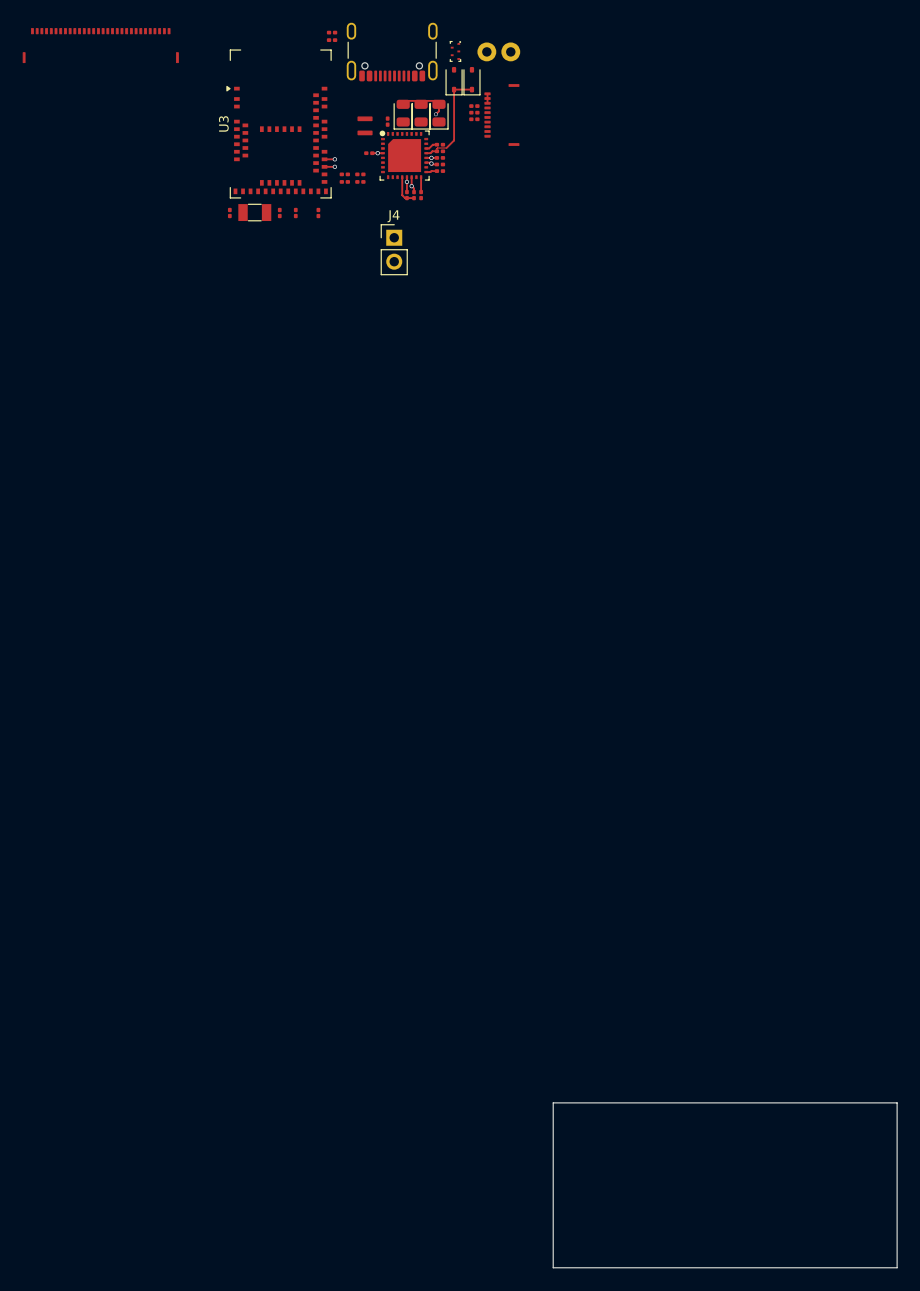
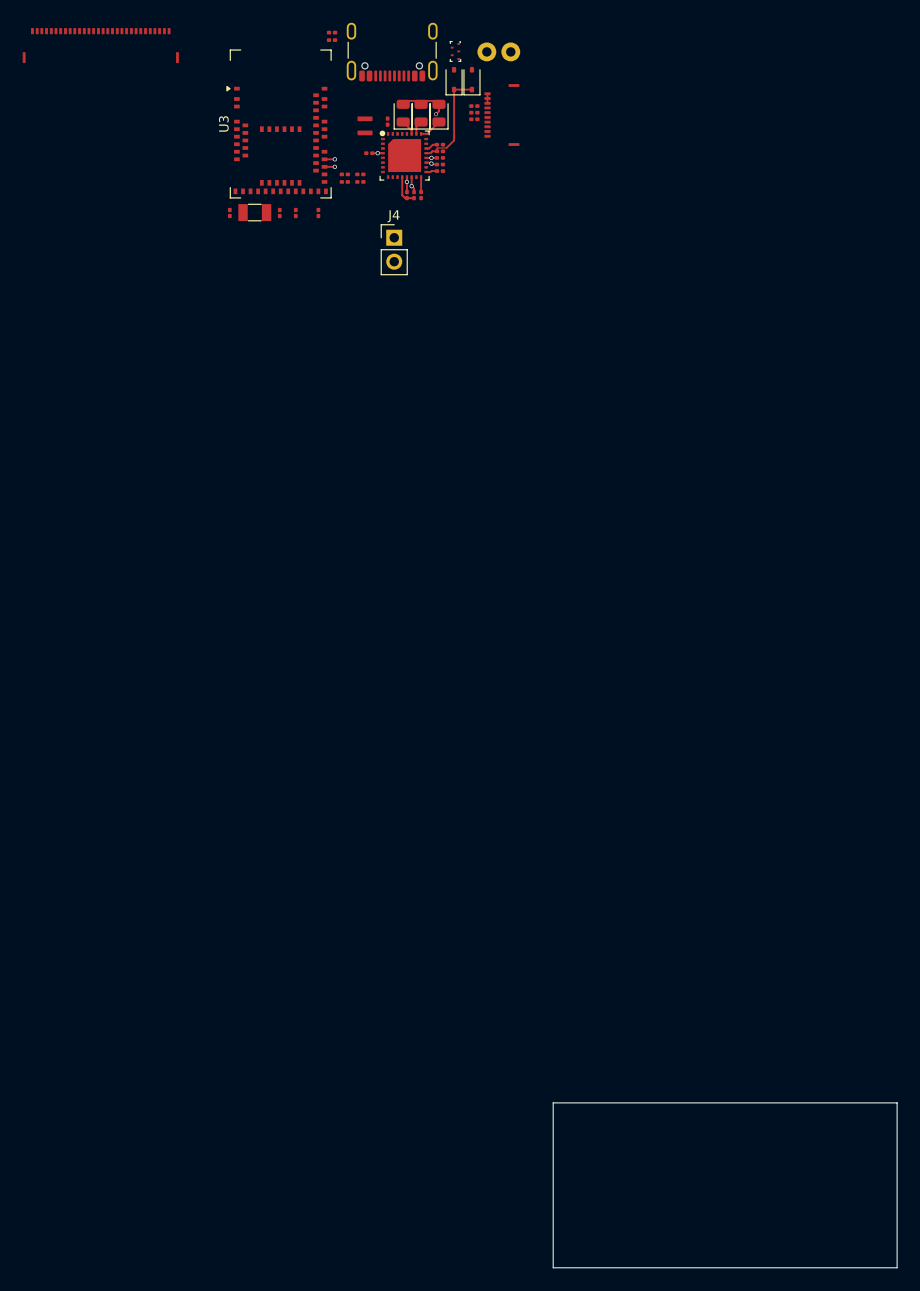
track: none -> (403, 121) (411, 130) (411, 133)
track: none -> (421, 121) (416, 126) (416, 133)
track: none -> (438, 121) (427, 133) (421, 133)

